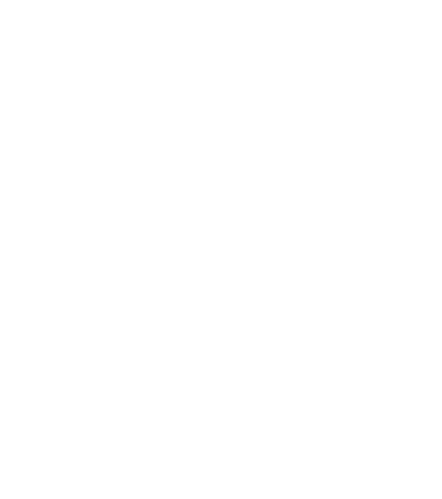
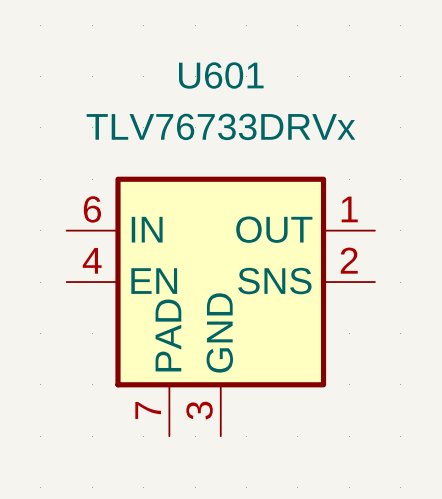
U601: none -> TLV76733DRVx (220, 306)

